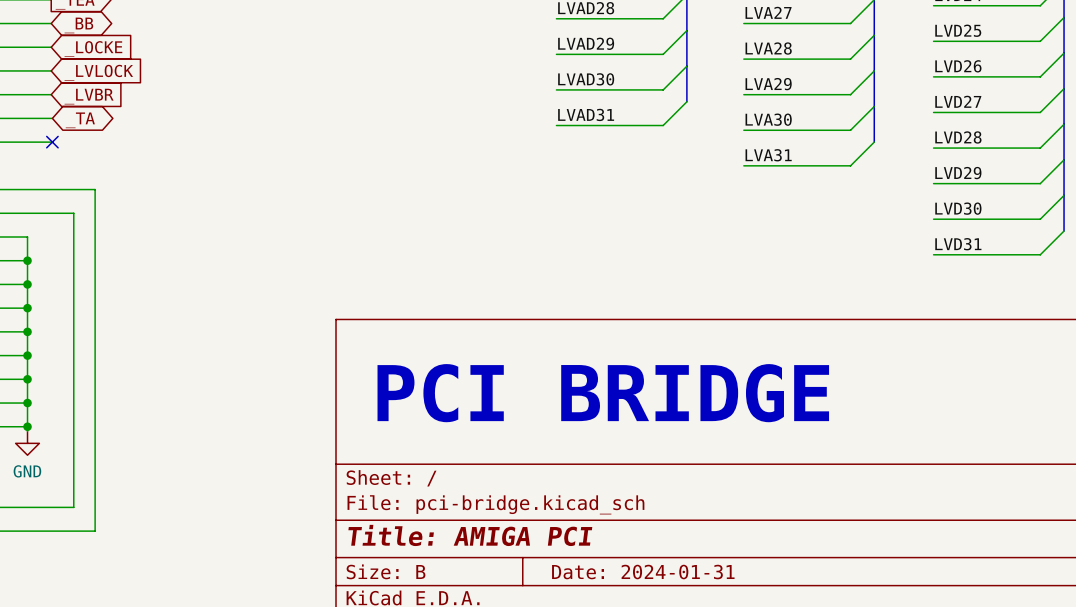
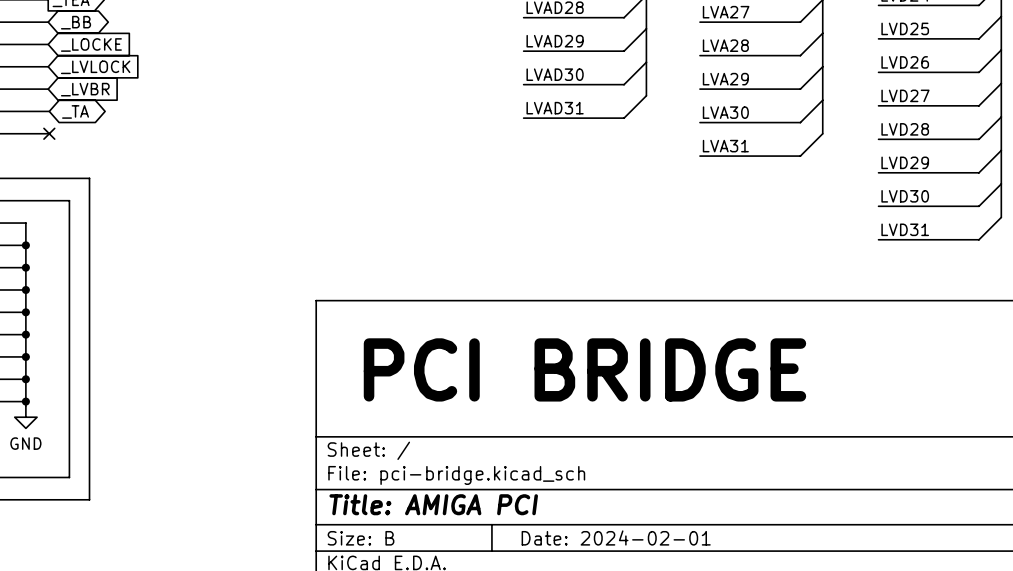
title block: Date: 2024-01-31 (643, 572) -> Date: 2024-02-01 (616, 537)

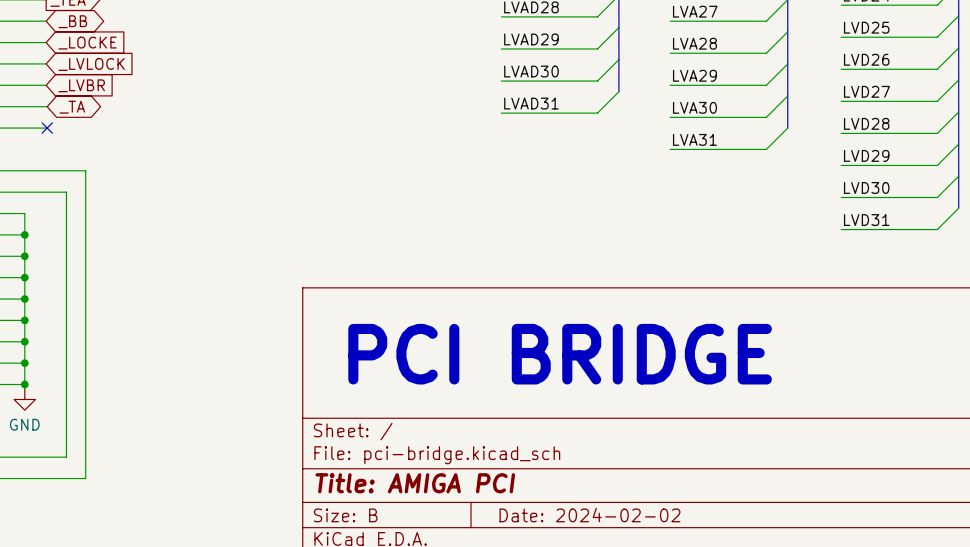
title block: Date: 2024-02-01 (616, 537) -> Date: 2024-02-02 (589, 515)

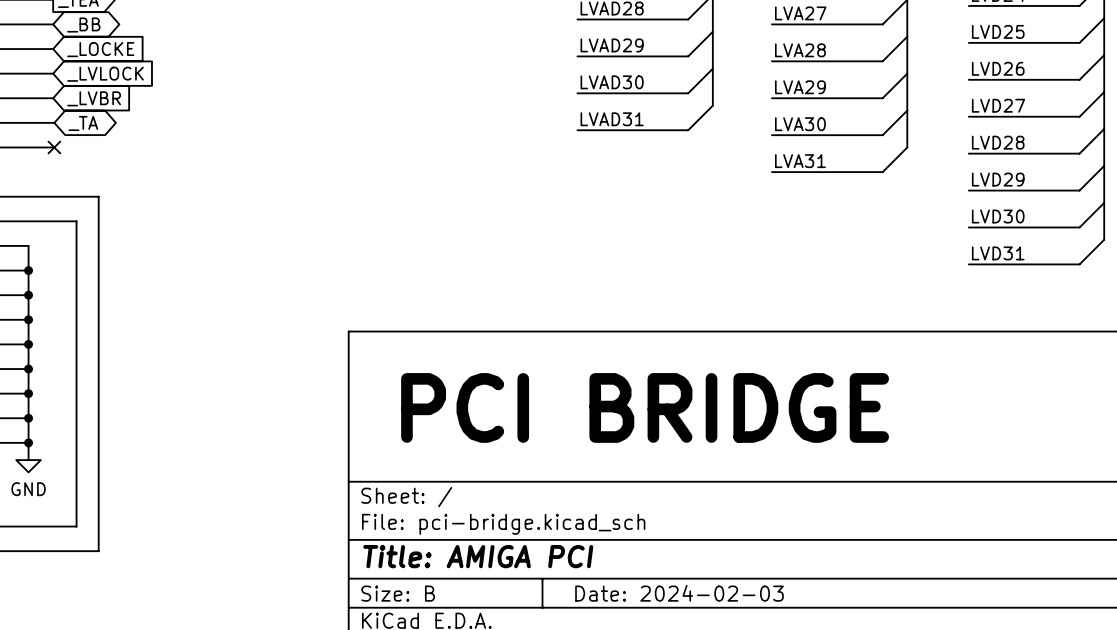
title block: Date: 2024-02-02 (589, 515) -> Date: 2024-02-03 (679, 593)

